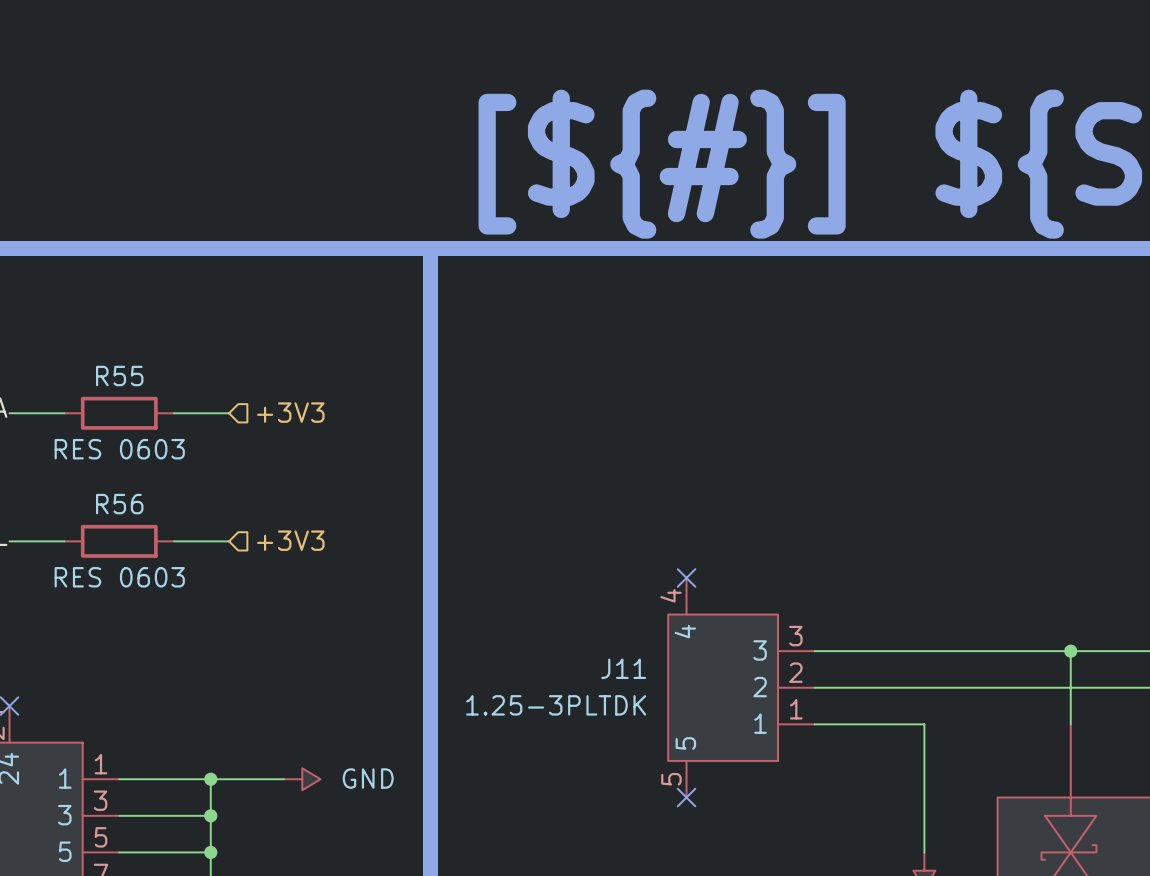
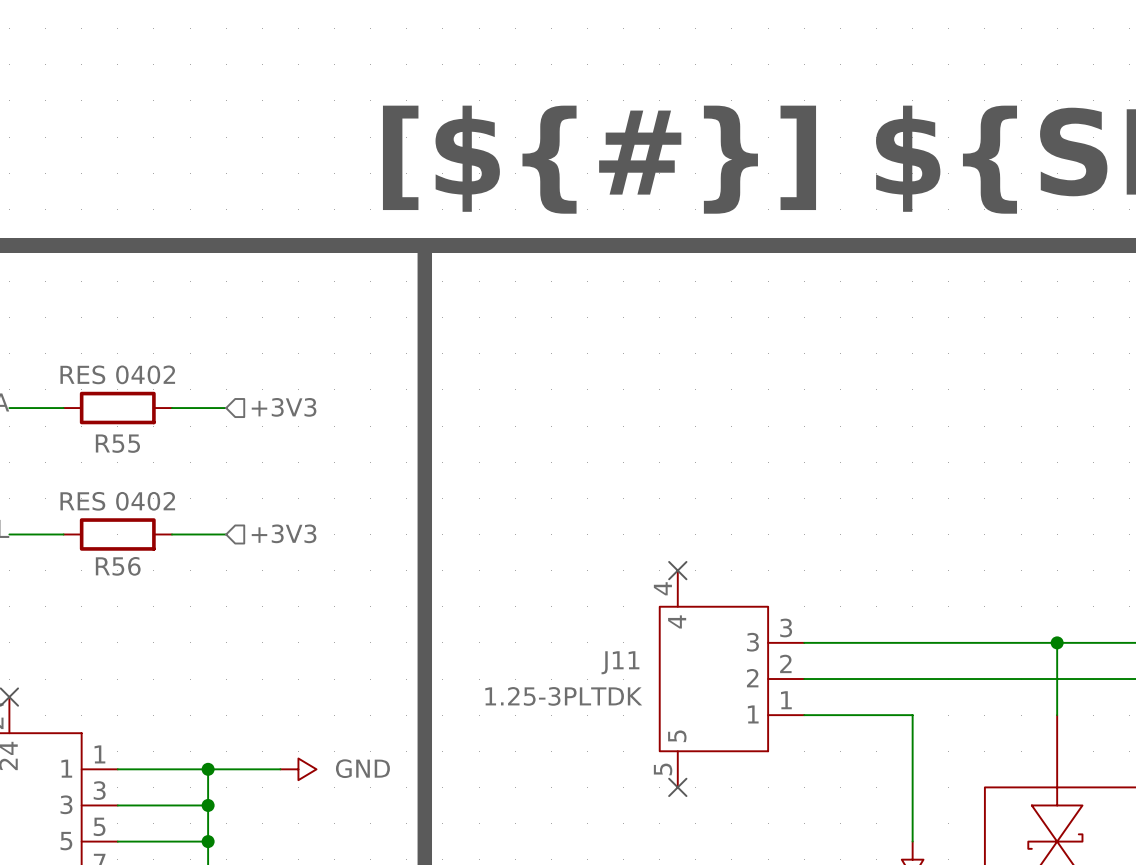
R55 name position: R55 (119, 376) -> R55 (117, 443)
R55 value: RES 0603 (119, 449) -> RES 0402 (117, 374)
R56 name position: R56 (119, 504) -> R56 (118, 566)
R56 value: RES 0603 (119, 577) -> RES 0402 (117, 501)

